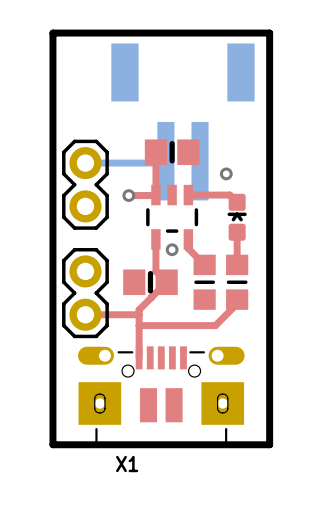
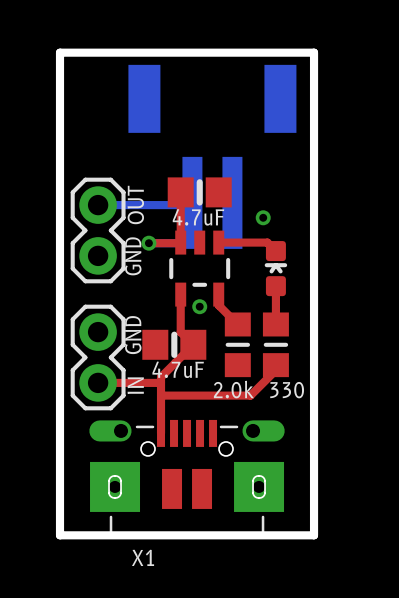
text: none -> OUT (135, 205)
text: none -> 4.7uF (198, 217)
text: none -> GND (133, 256)
text: none -> GND (133, 335)
text: none -> 4.7uF (178, 369)
text: none -> IN (135, 385)
text: none -> 2.0k (233, 389)
text: none -> 330 (287, 390)

